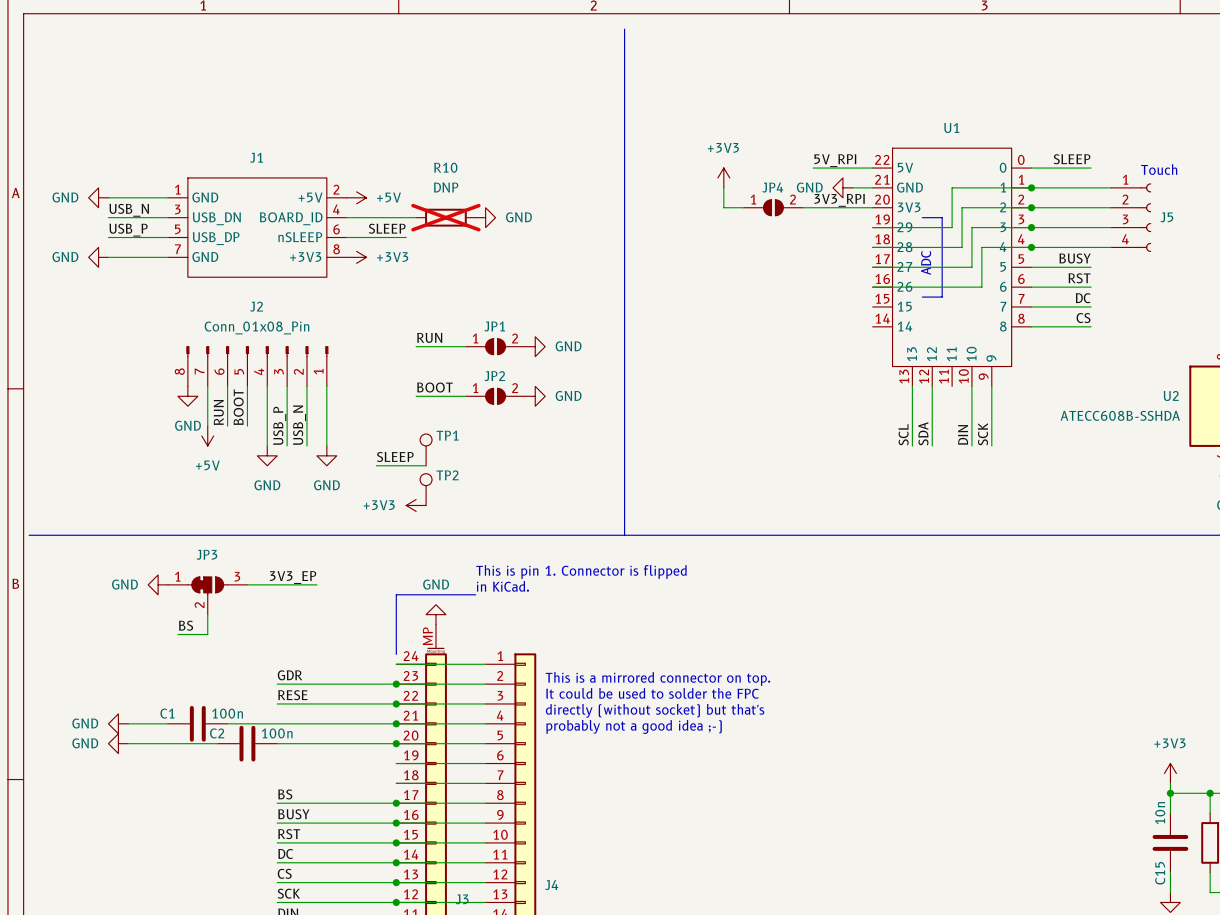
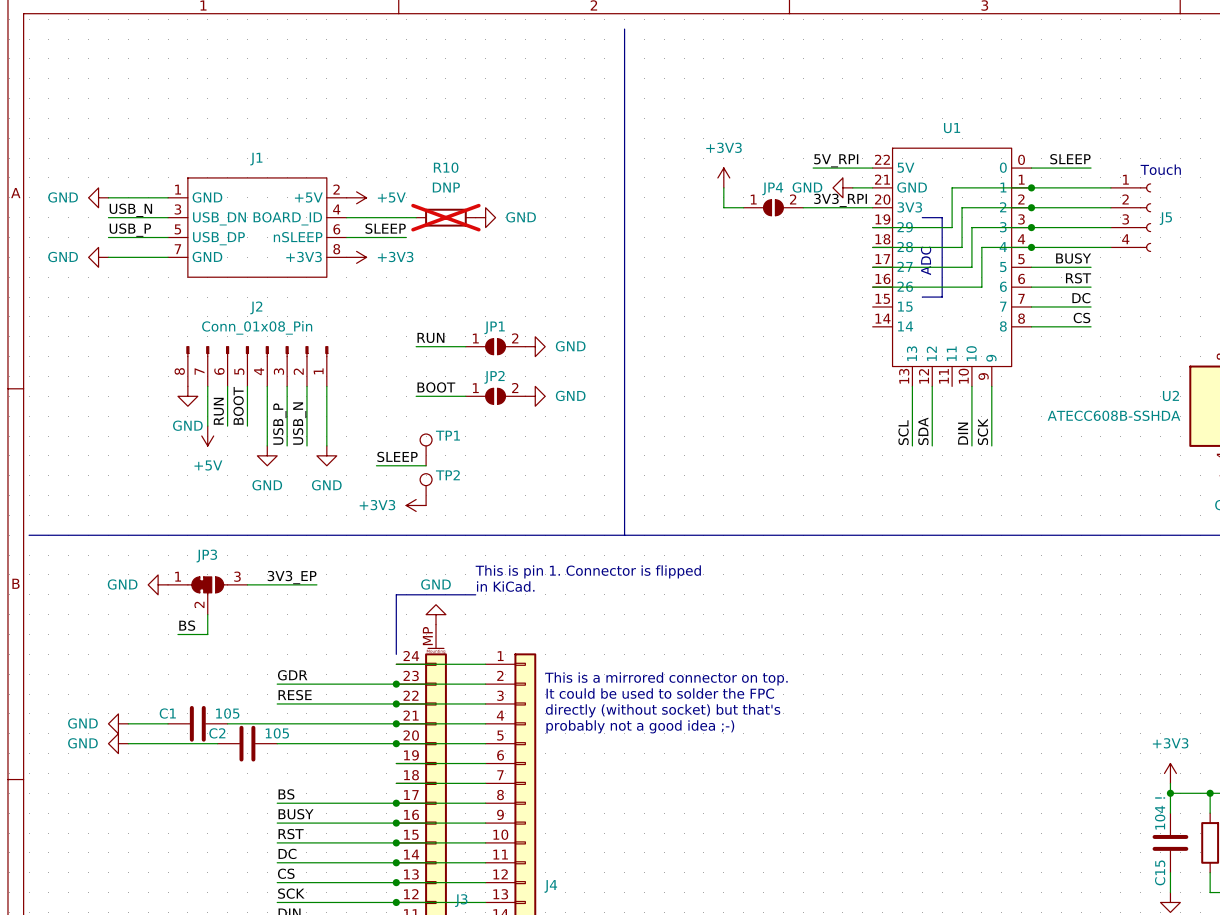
C1 value: 100n (227, 713) -> 105 (227, 713)
C2 value: 100n (277, 733) -> 105 (277, 733)
C15 value: 10n (1160, 813) -> 104 ! (1160, 813)

